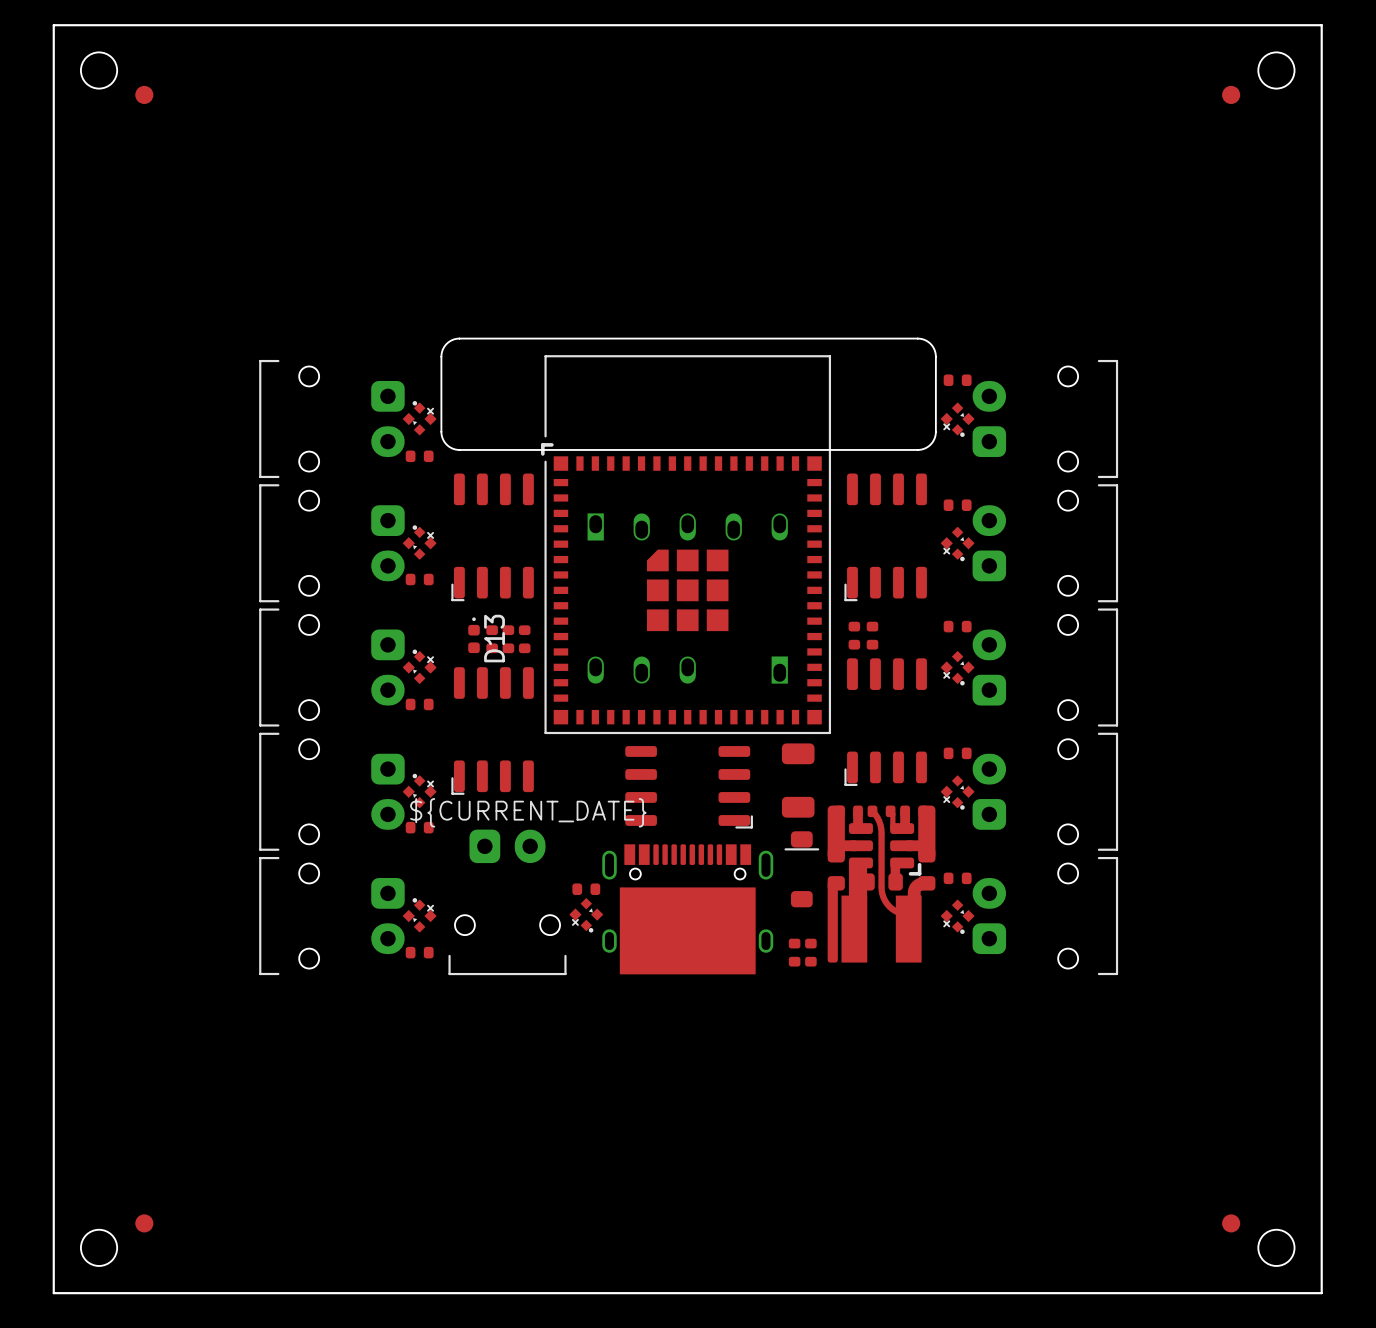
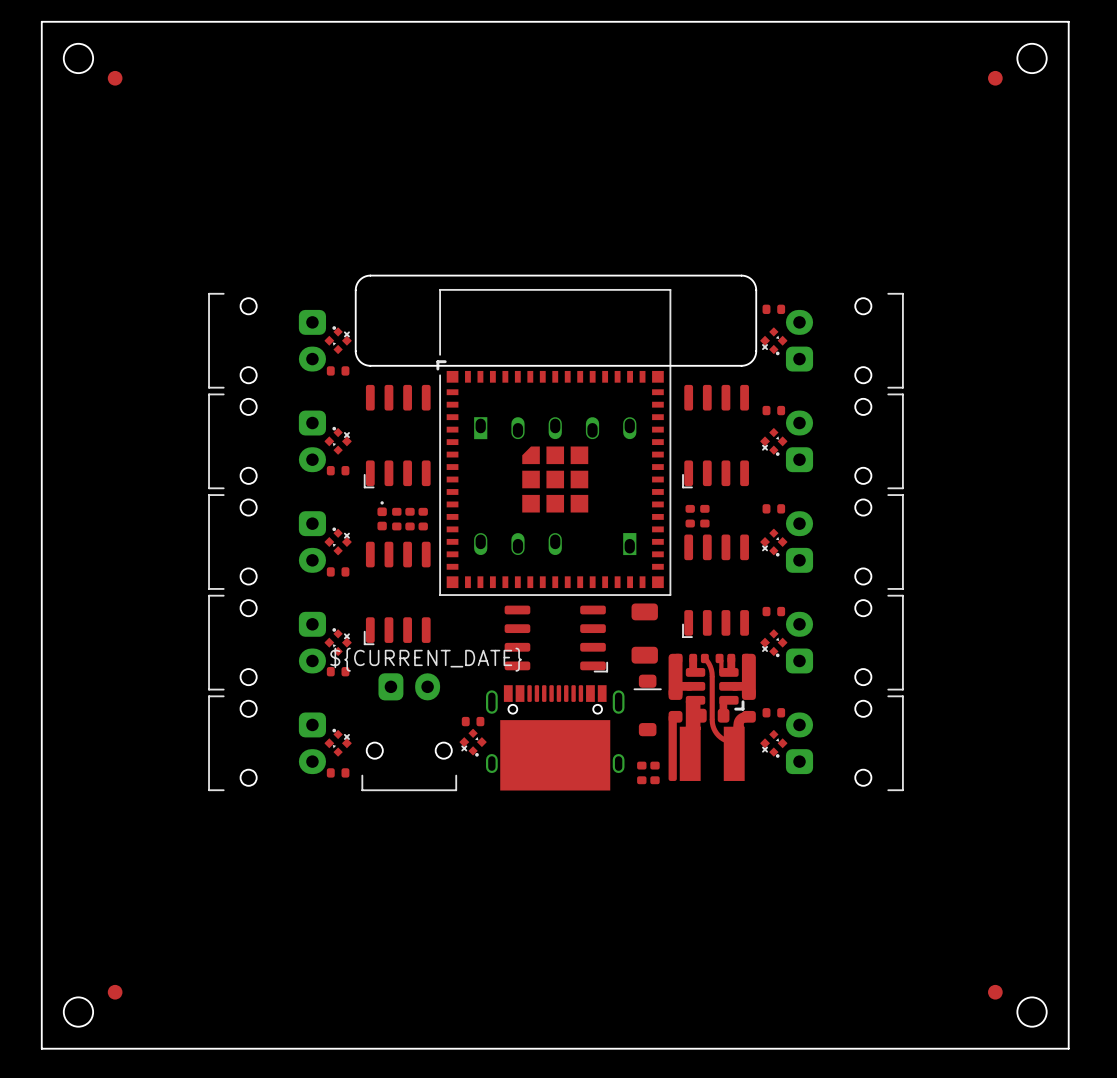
D13 name: D13 (494, 638) -> none

